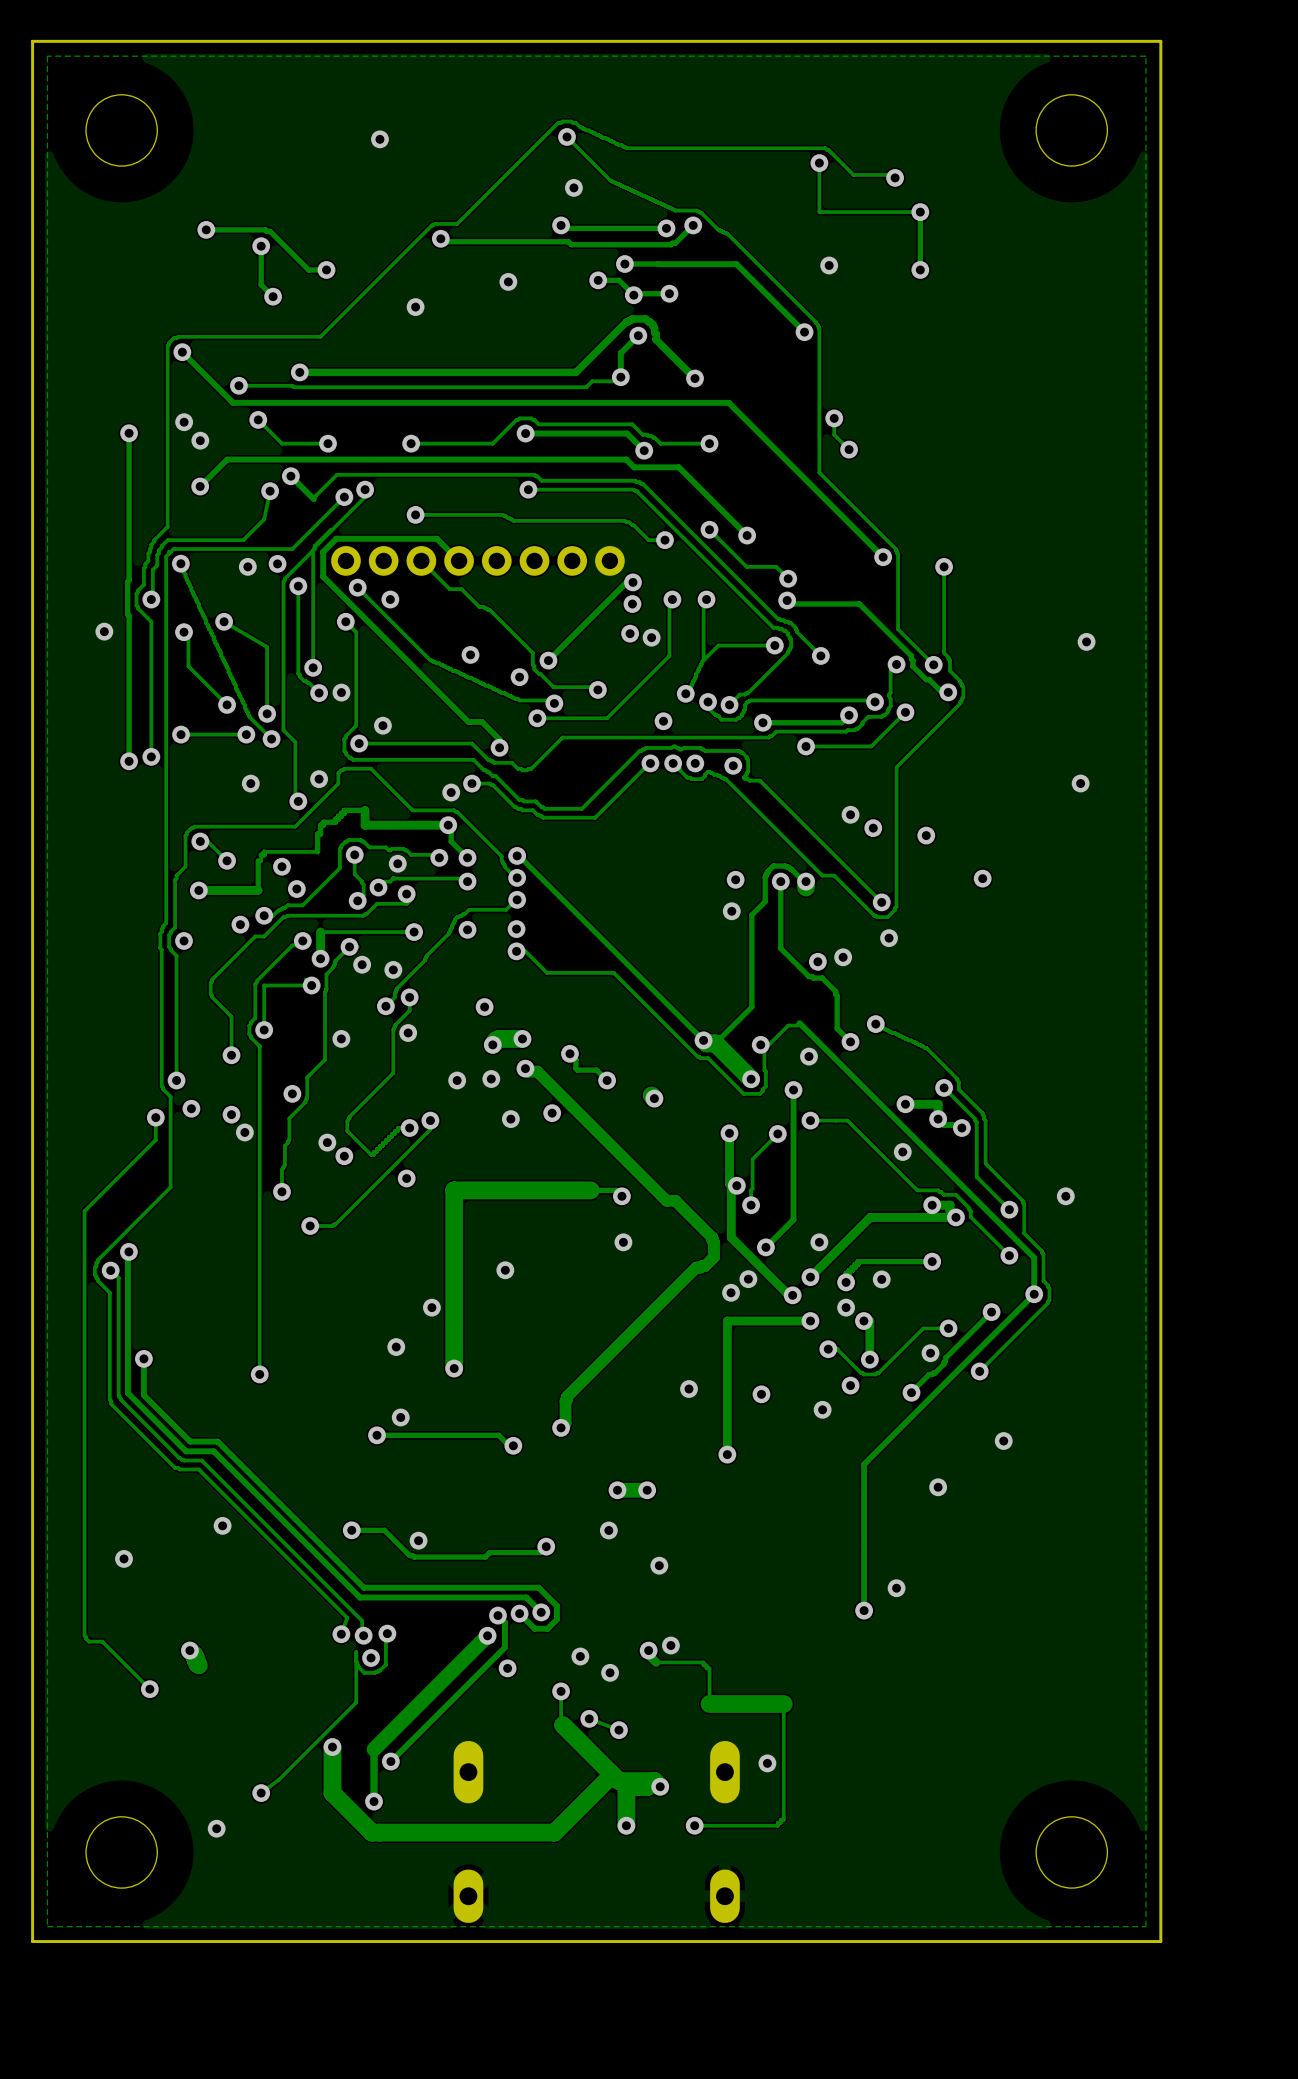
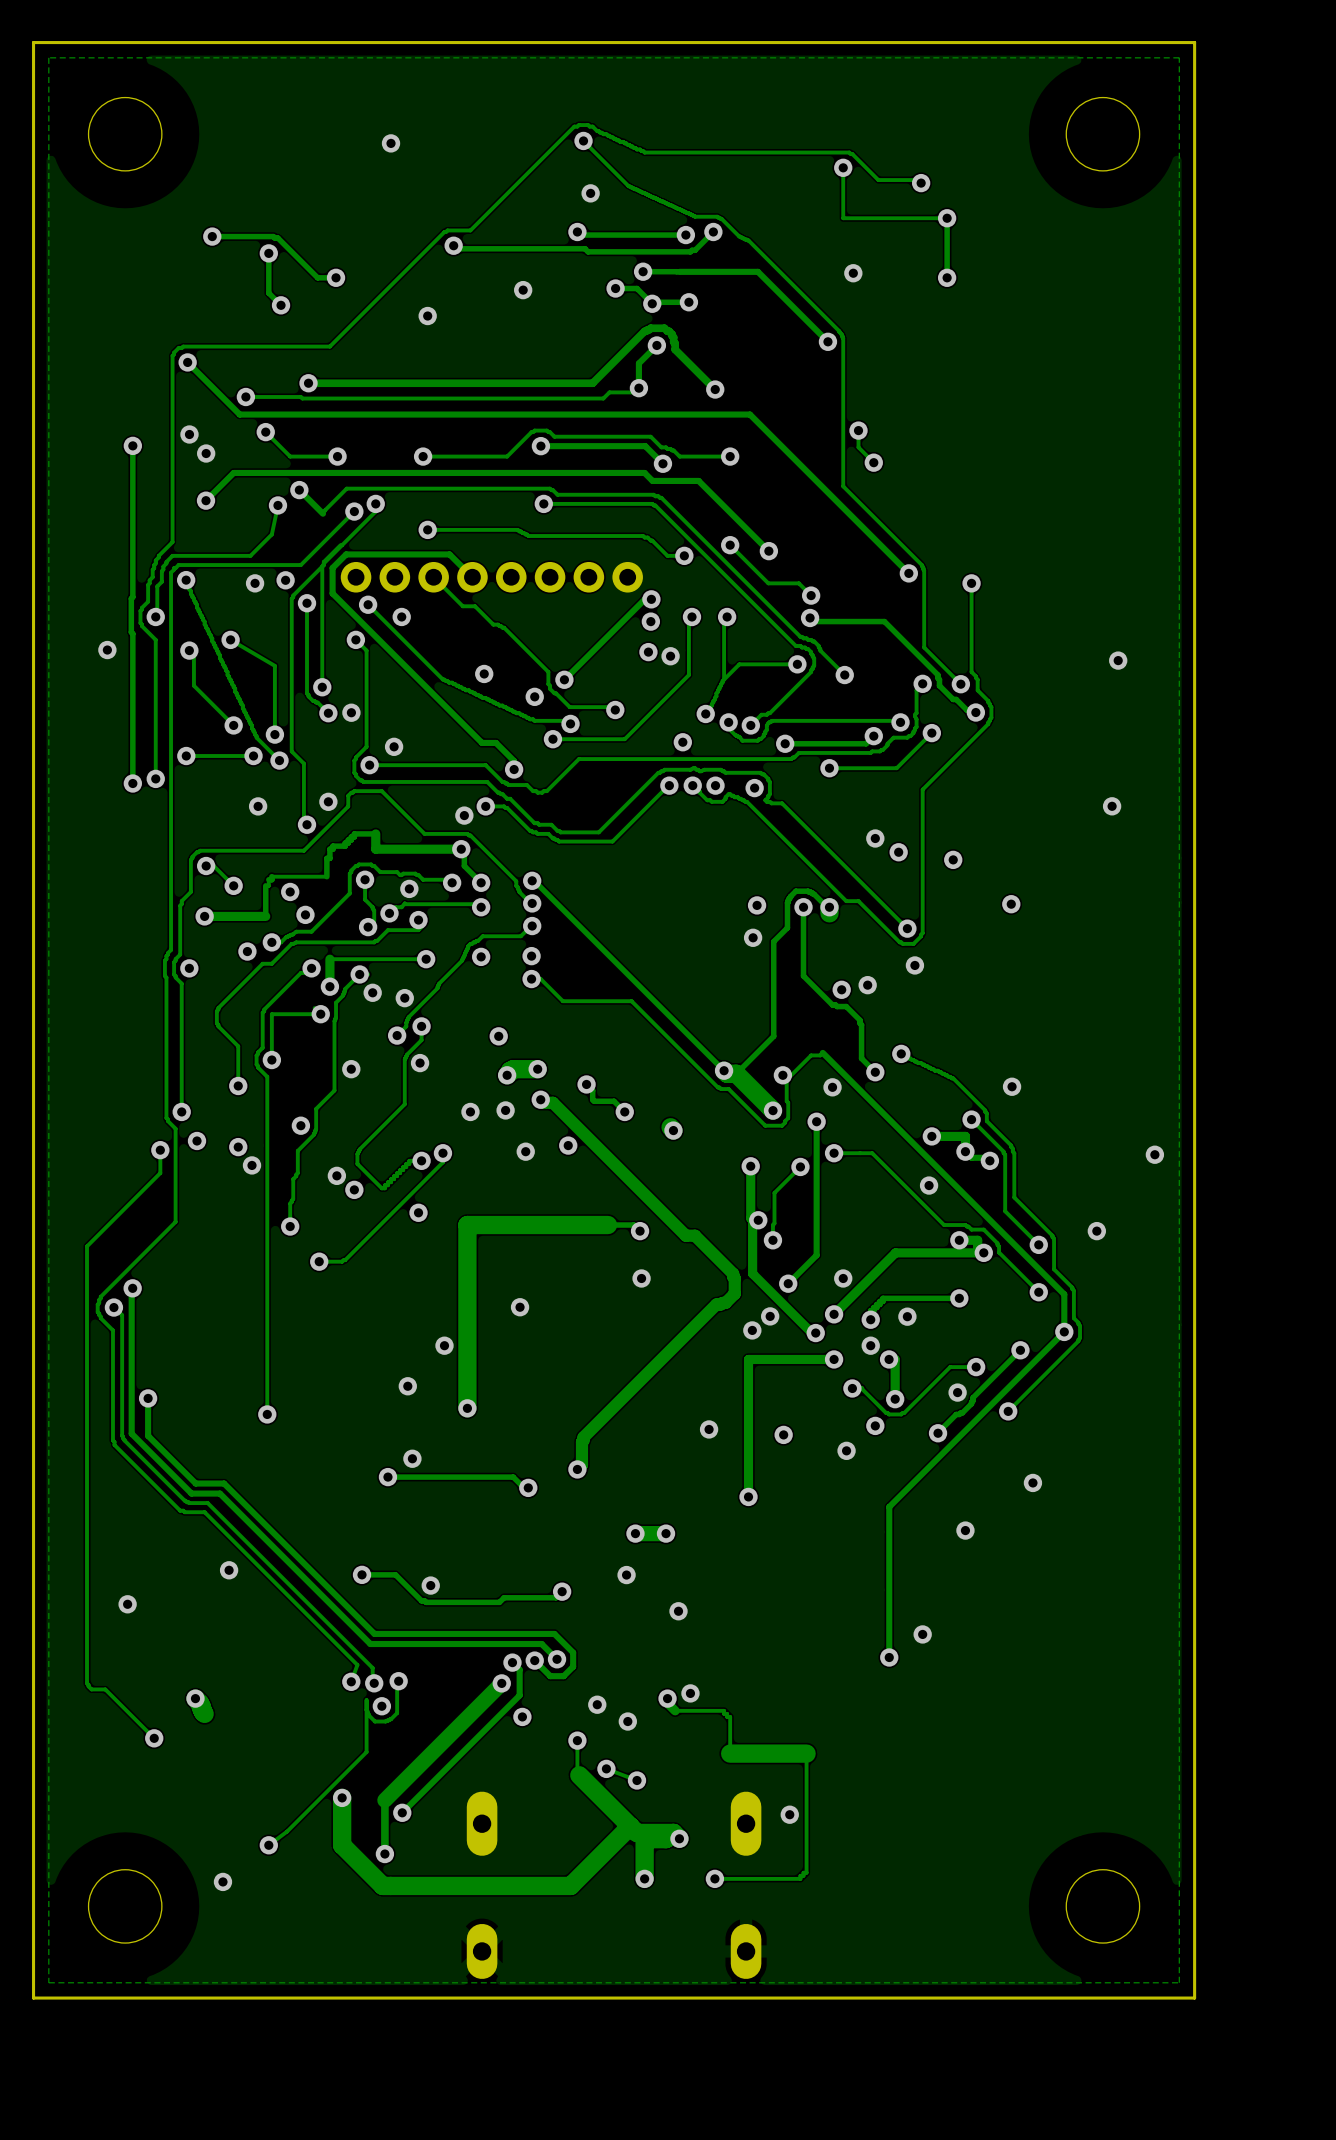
via: none -> (1012, 1086)
via: none -> (1154, 1154)

